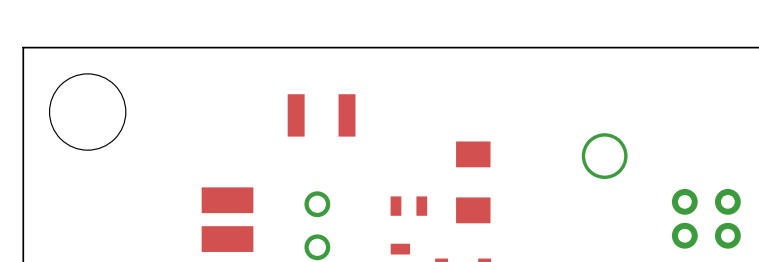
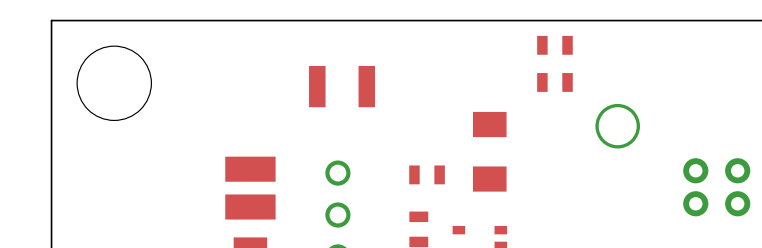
part: none -> (554, 45)
part: none -> (554, 82)

